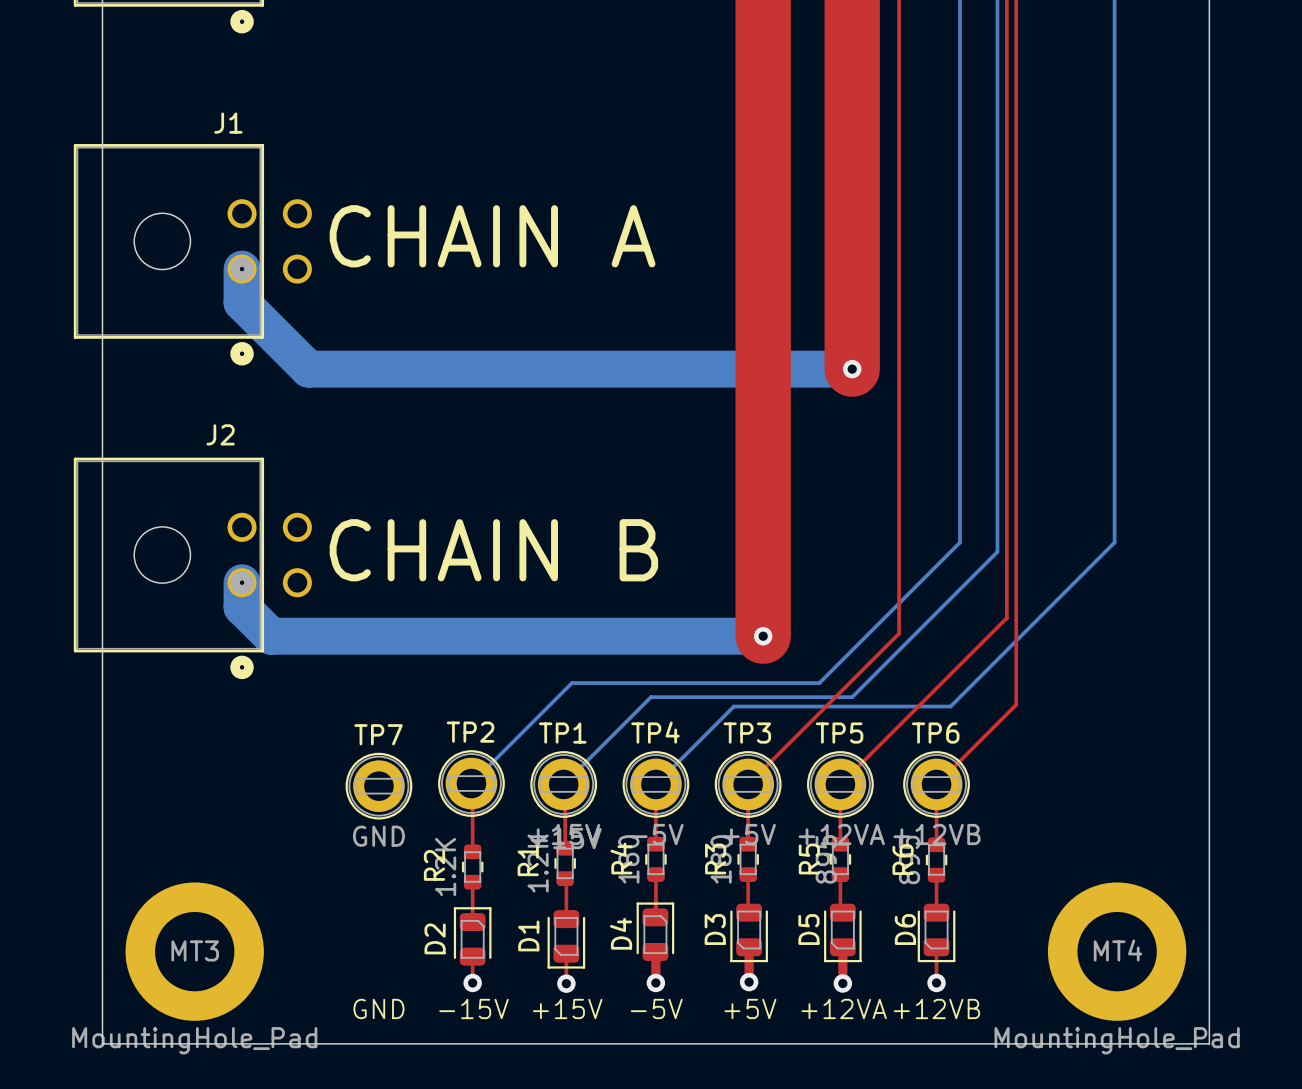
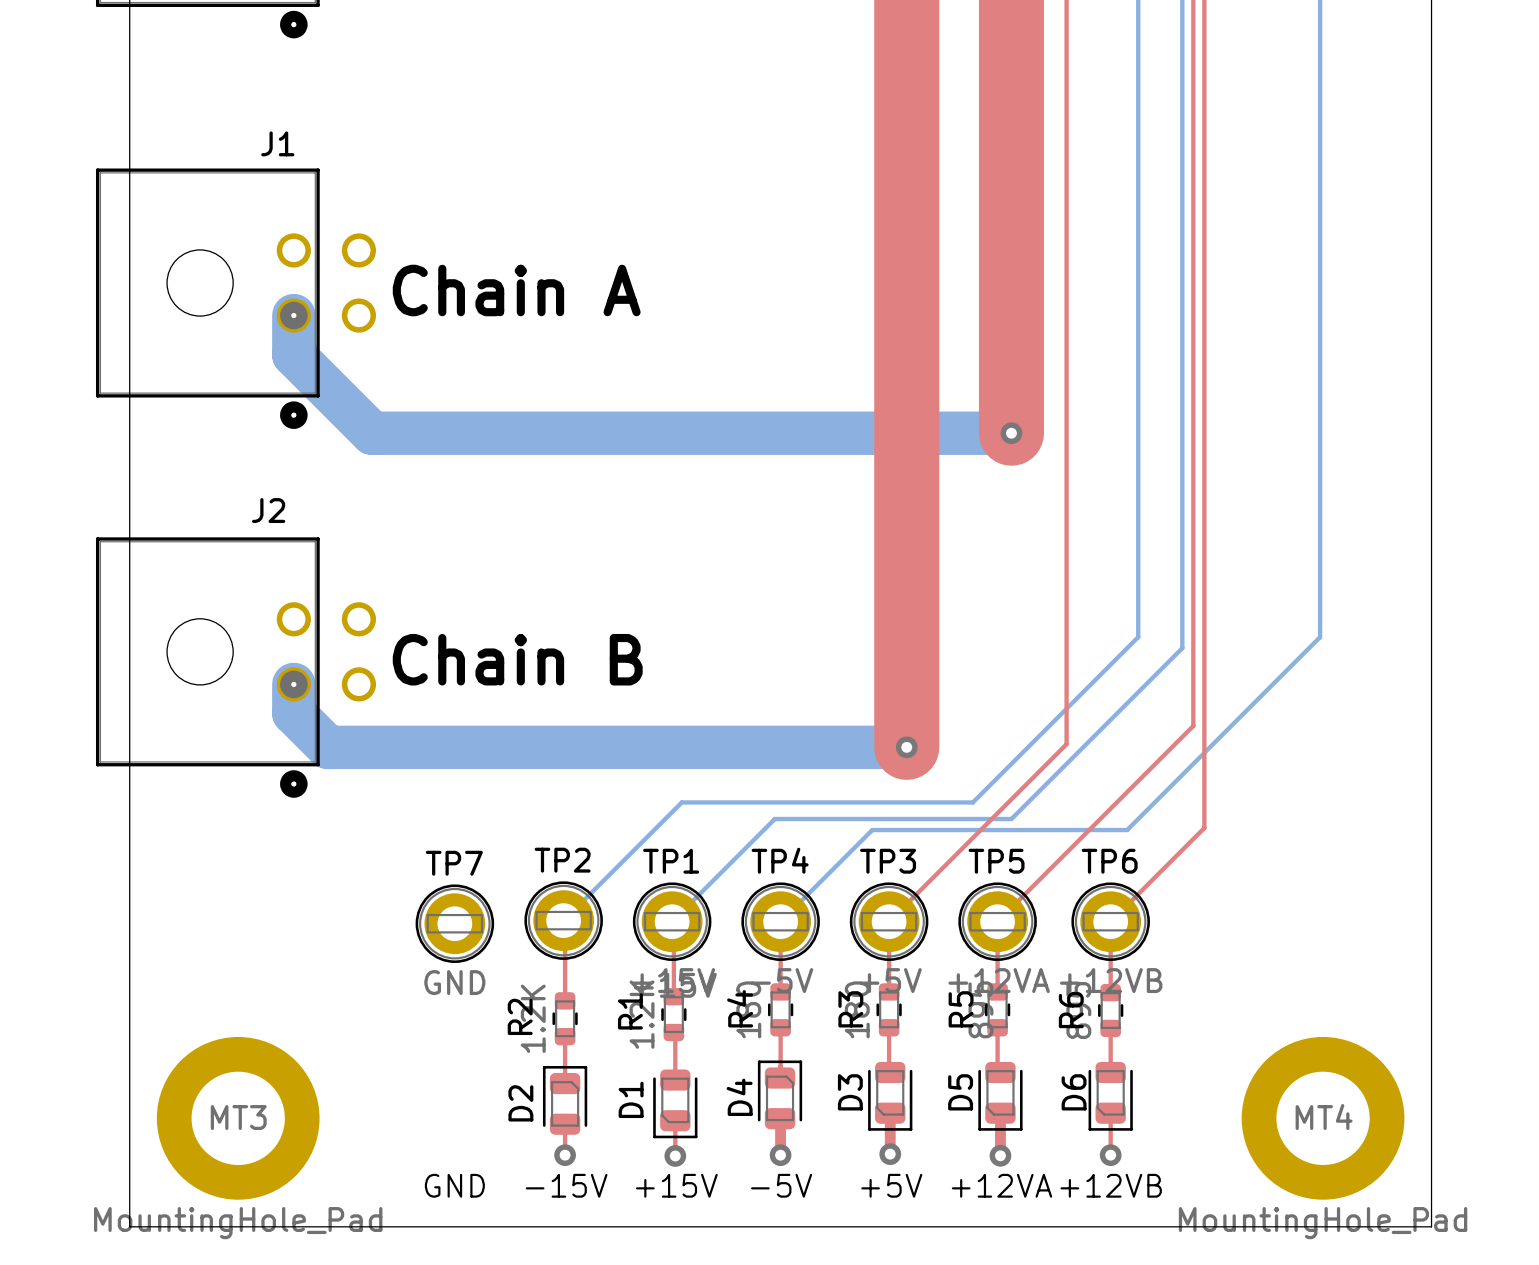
text: CHAIN A (492, 236) -> Chain A (516, 290)
text: CHAIN B (493, 550) -> Chain B (517, 659)

